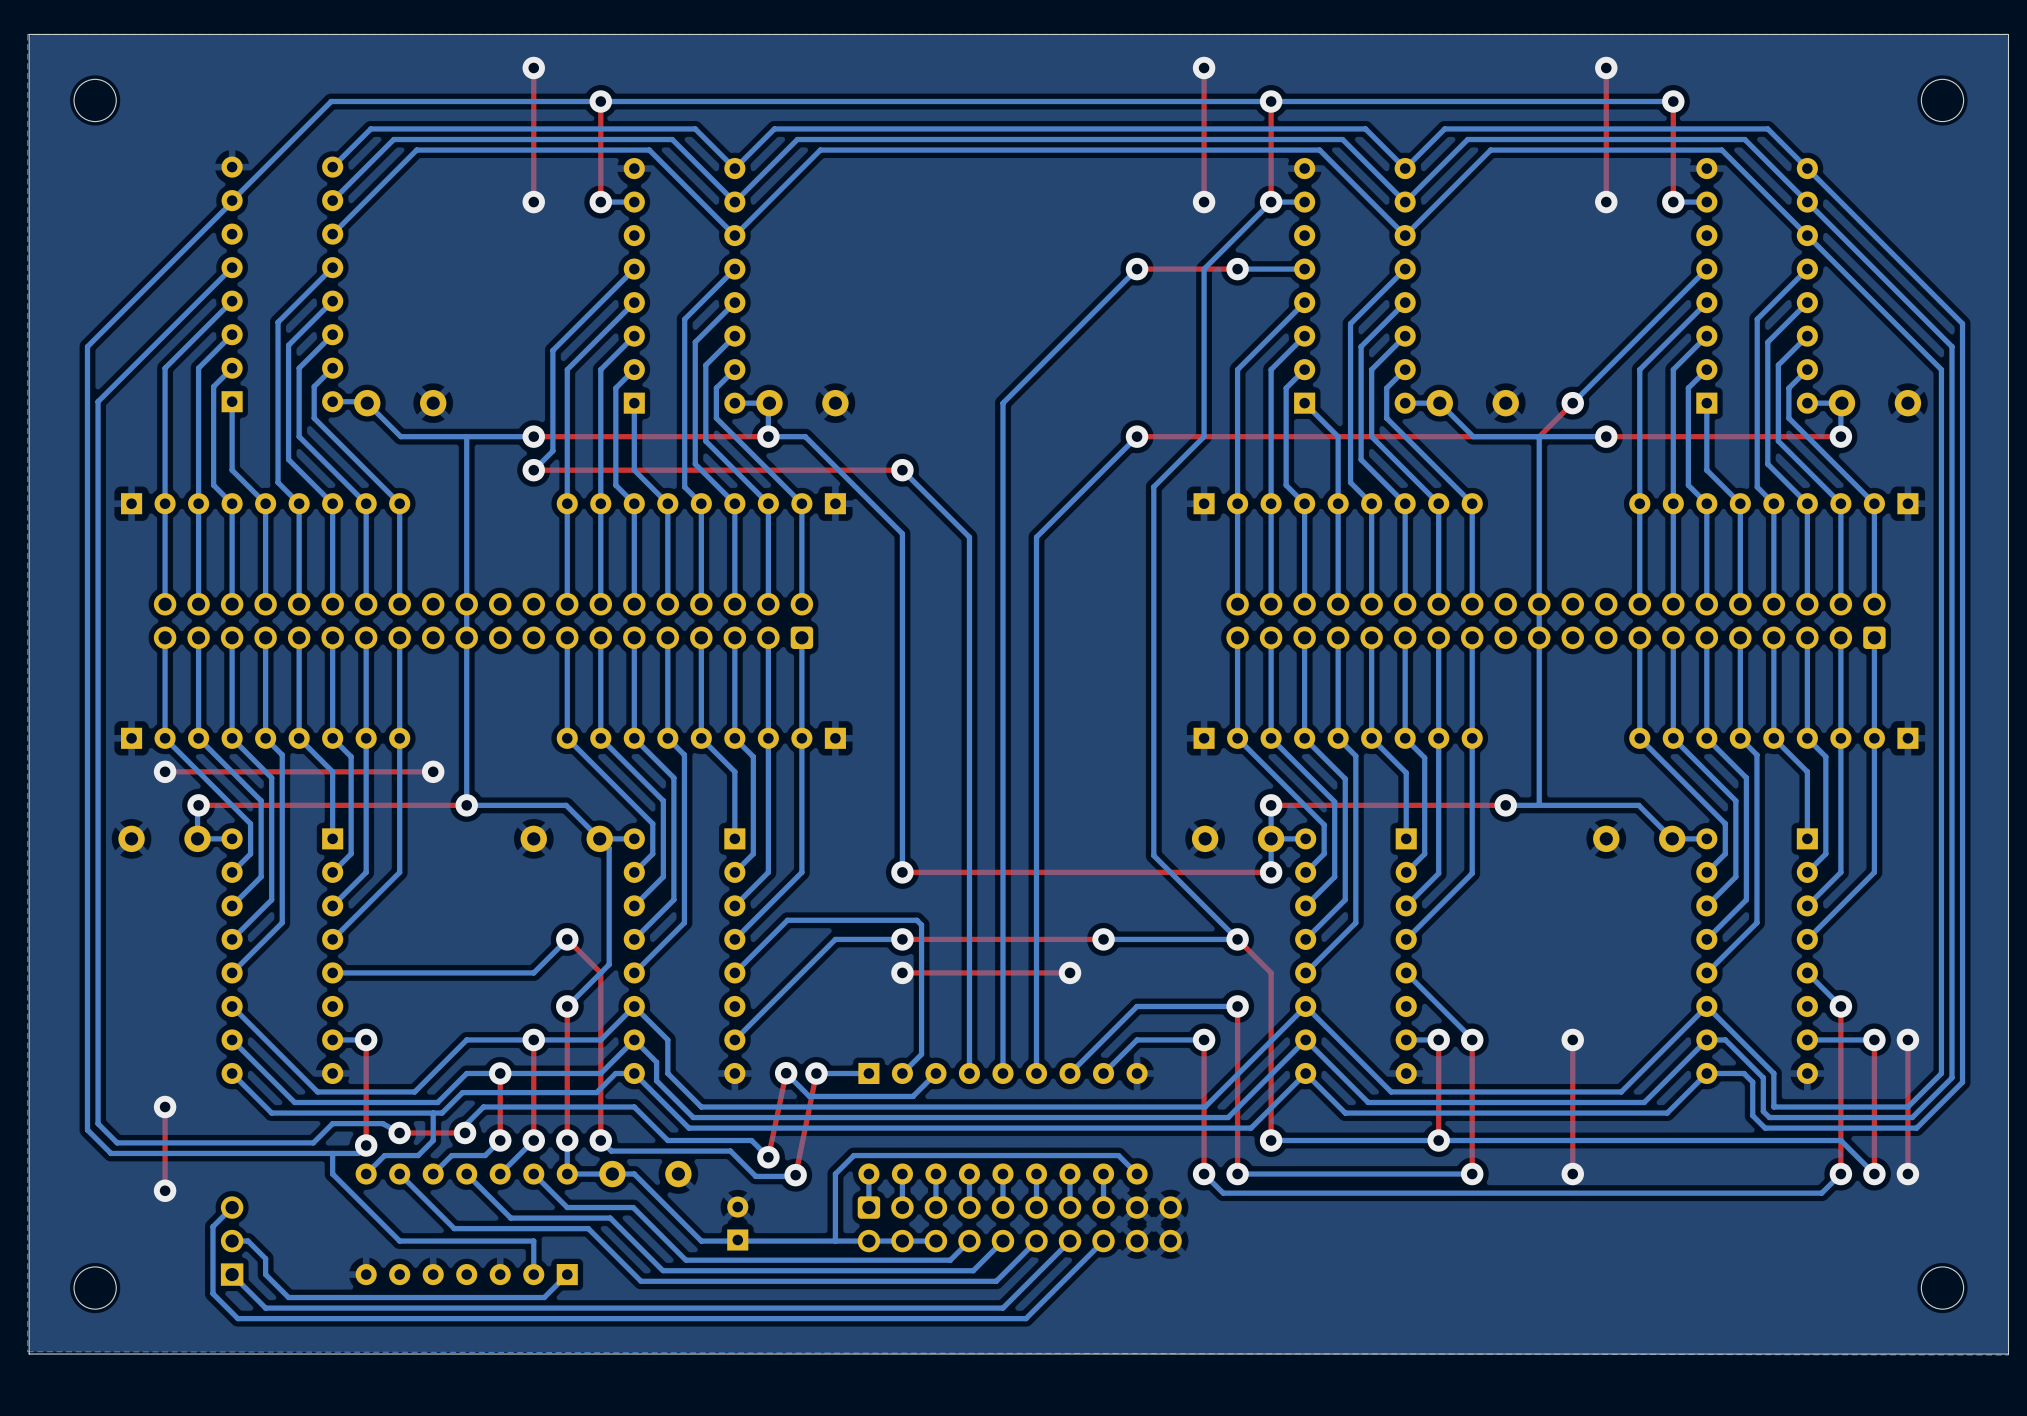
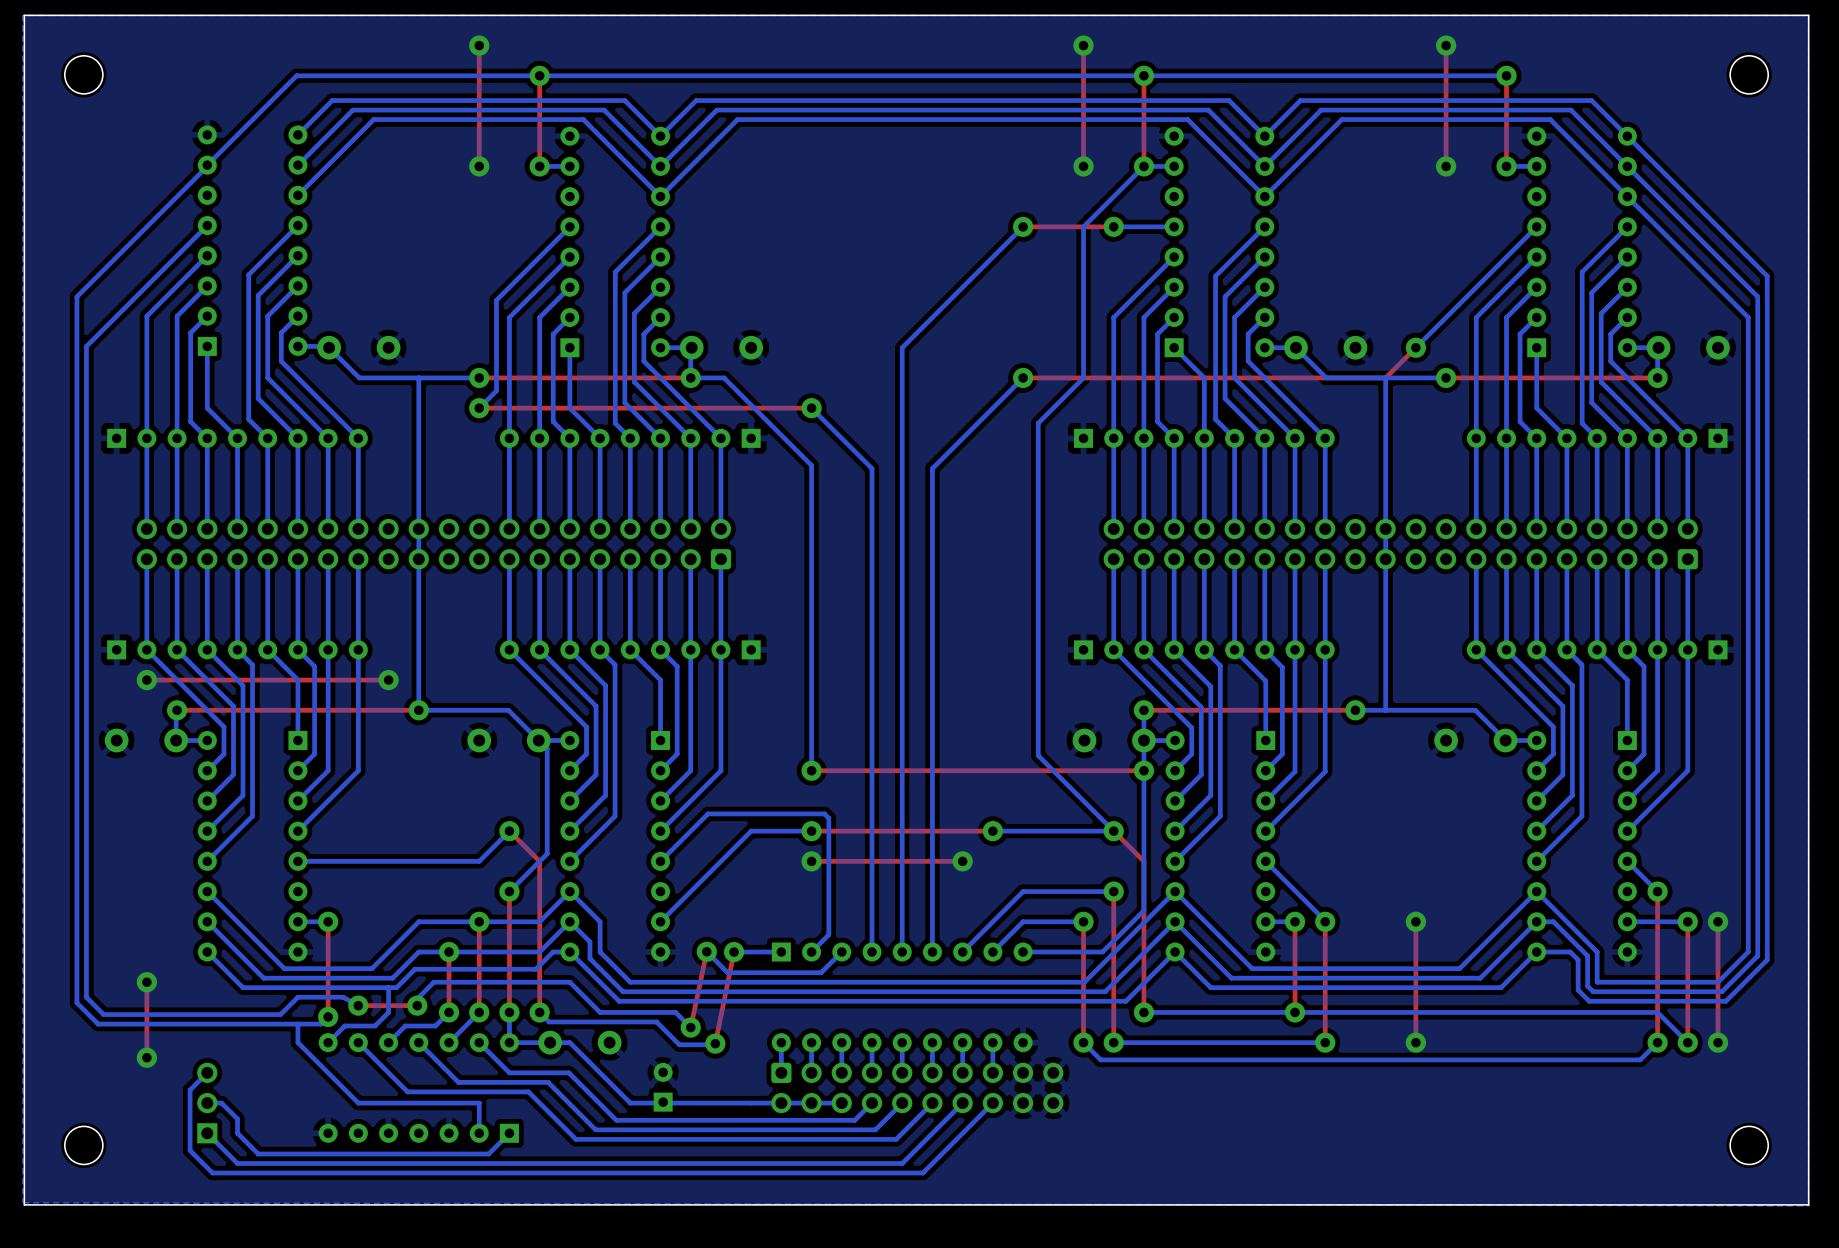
bottom track: none -> (1143, 770) (1143, 910) (1102, 952) (1023, 952)
bottom track: (1137, 1174) (1118, 1155) (853, 1155) (835, 1174) (835, 1241) -> none

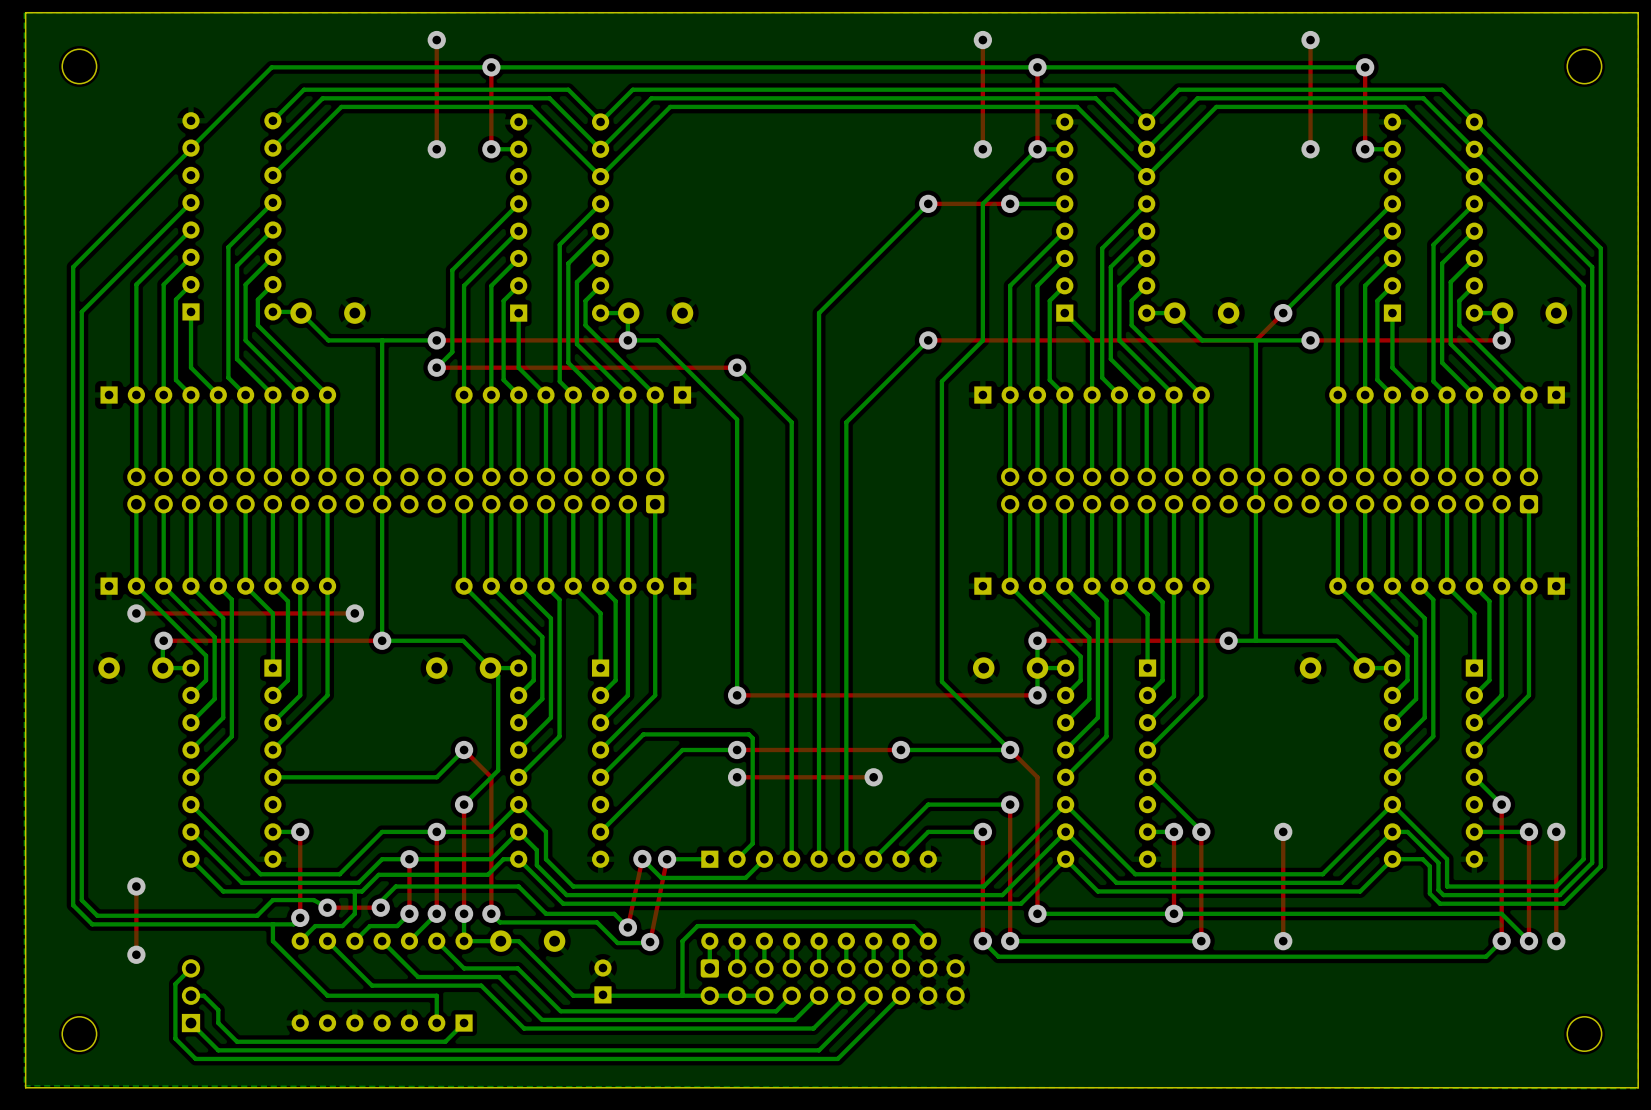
bottom track: (1143, 770) (1143, 910) (1102, 952) (1023, 952) -> none
bottom track: none -> (928, 941) (913, 926) (697, 926) (682, 941) (682, 995)

